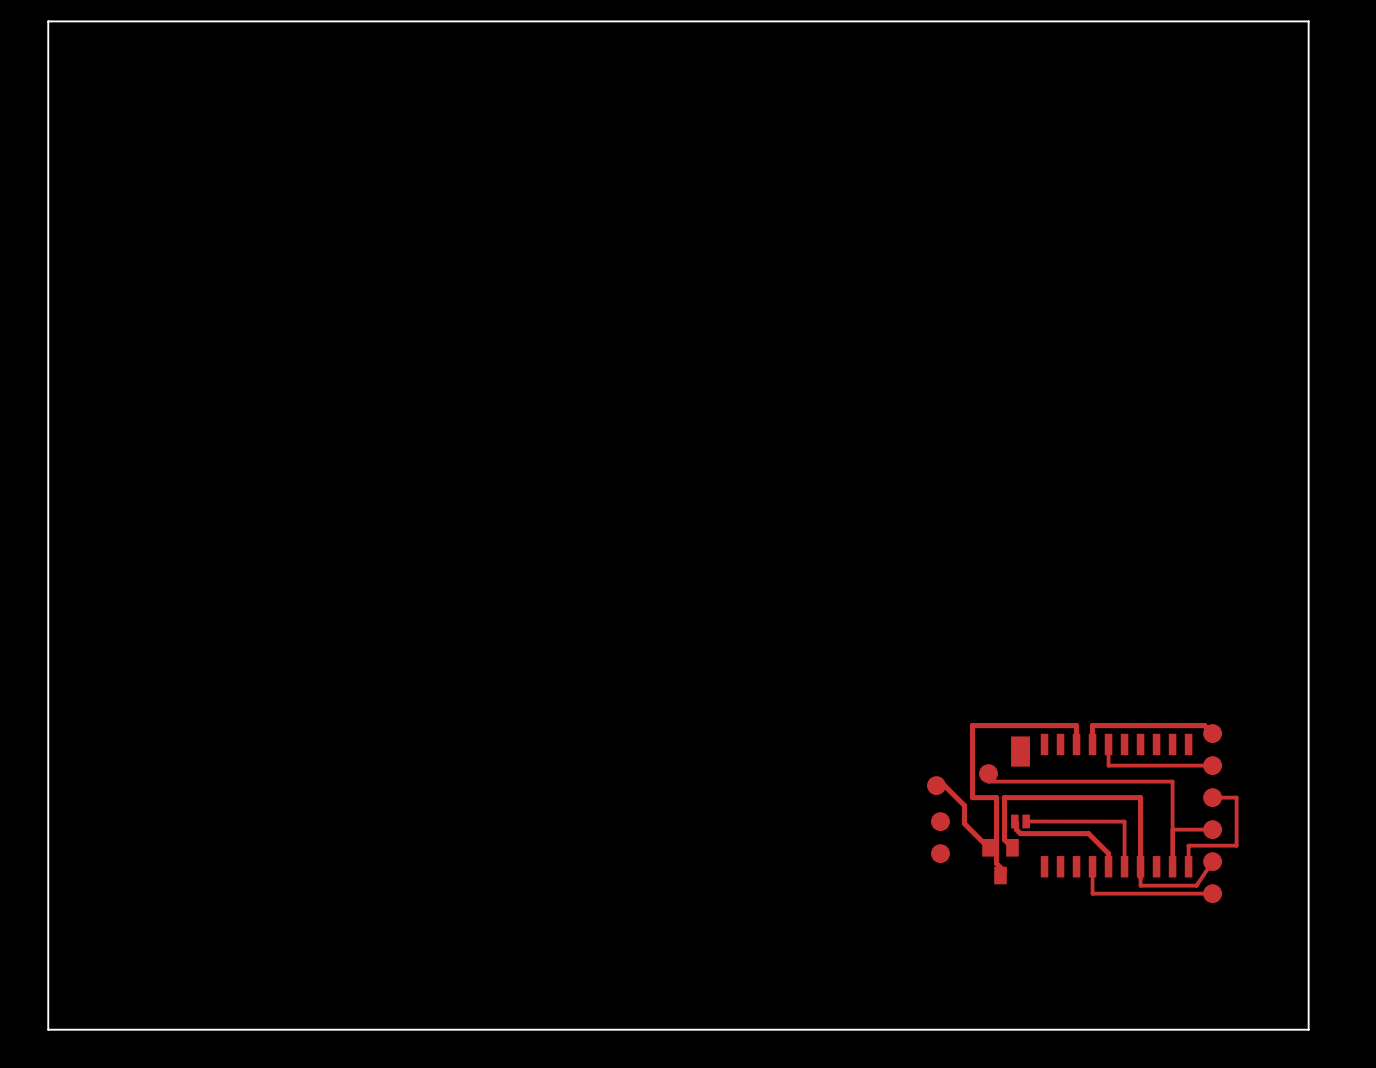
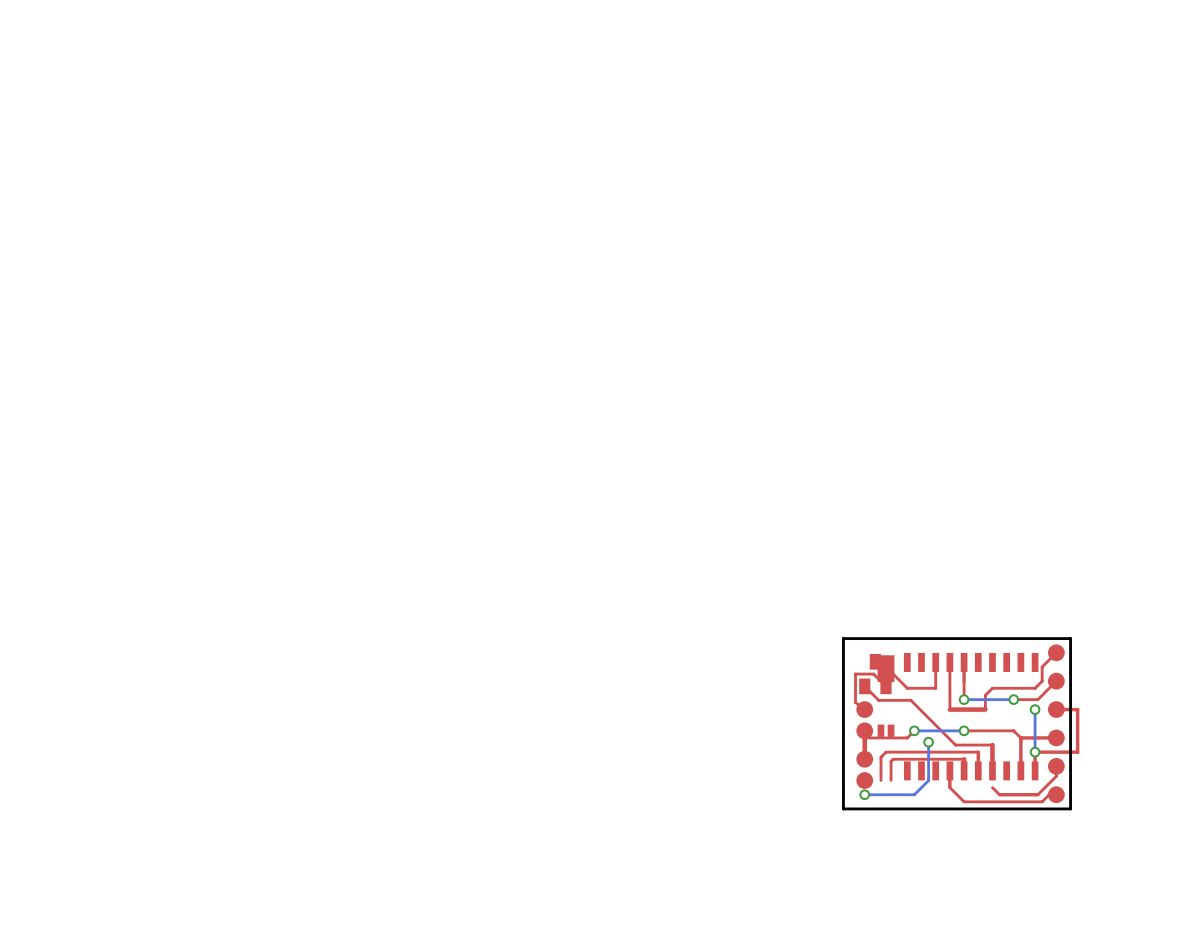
board edge: (1308, 21) (48, 21) (48, 1029) (1308, 1029) (1308, 21) -> none
board edge: none -> (1070, 638) (843, 638) (843, 808) (1070, 808) (1070, 638)
top track: (1212, 733) (1204, 725) (1092, 725) (1092, 744) -> (1056, 652) (1042, 666) (1042, 681) (1035, 688) (992, 688) (985, 695) (985, 709)
top track: none -> (875, 661) (880, 661) (907, 688) (935, 688) (935, 669)
top track: (1076, 744) (1076, 725) (972, 725) (972, 797) (996, 797) (996, 829) -> (914, 730) (907, 737) (864, 737)
top track: none -> (964, 681) (964, 699)
top track: (1212, 765) (1108, 765) -> (1056, 681) (1037, 699) (1013, 699)
top track: none -> (885, 686) (873, 674) (855, 674) (855, 702) (864, 709)
top track: (988, 773) (988, 781) (1172, 781) (1172, 829) -> (964, 730) (1013, 730) (1020, 737)
part: (988, 773) -> none
top track: (936, 785) (944, 785) (964, 805) (964, 823) (988, 847) -> none
part: (936, 785) -> none
via: none -> (964, 699)
bottom track: none -> (1013, 699) (964, 699)
via: none -> (1013, 699)
part: none -> (864, 709)
top track: (1092, 797) (1004, 797) (1004, 839) (1012, 847) -> (949, 709) (949, 669)
top track: (1132, 797) (1140, 797) (1140, 837) -> (864, 686) (878, 700) (910, 700) (955, 745) (992, 745)
bottom track: none -> (1035, 709) (1035, 752)
via: none -> (1035, 709)
part: (940, 821) -> none
part: none -> (864, 730)
top track: (1014, 821) (1016, 829) (1020, 833) (1088, 833) (1108, 853) -> (891, 780) (891, 761) (893, 759) (964, 759)
top track: (1026, 821) (1124, 821) (1124, 845) -> (880, 780) (880, 757) (886, 752) (978, 752)
via: none -> (914, 730)
bottom track: none -> (964, 730) (914, 730)
via: none -> (964, 730)
bottom track: none -> (928, 742) (928, 780) (914, 794) (864, 794)
via: none -> (928, 742)
via: none -> (1035, 752)
part: (940, 853) -> none
top track: (996, 853) (996, 863) (1004, 871) (1000, 875) -> none
part: none -> (864, 759)
part rotation: 0° (1000, 861) -> 180° (875, 674)
part position: (1000, 861) -> (875, 674)
top track: (1212, 861) (1196, 885) (1140, 885) (1140, 874) (1140, 877) -> none
part: none -> (864, 780)
top track: (1092, 885) (1092, 893) (1148, 893) -> (992, 787) (999, 794)
top track: none -> (949, 787) (964, 801) (1042, 801) (1049, 794)
via: none -> (864, 794)
top track: (1204, 893) (1191, 893) -> (1056, 766) (1056, 776) (1037, 794)

